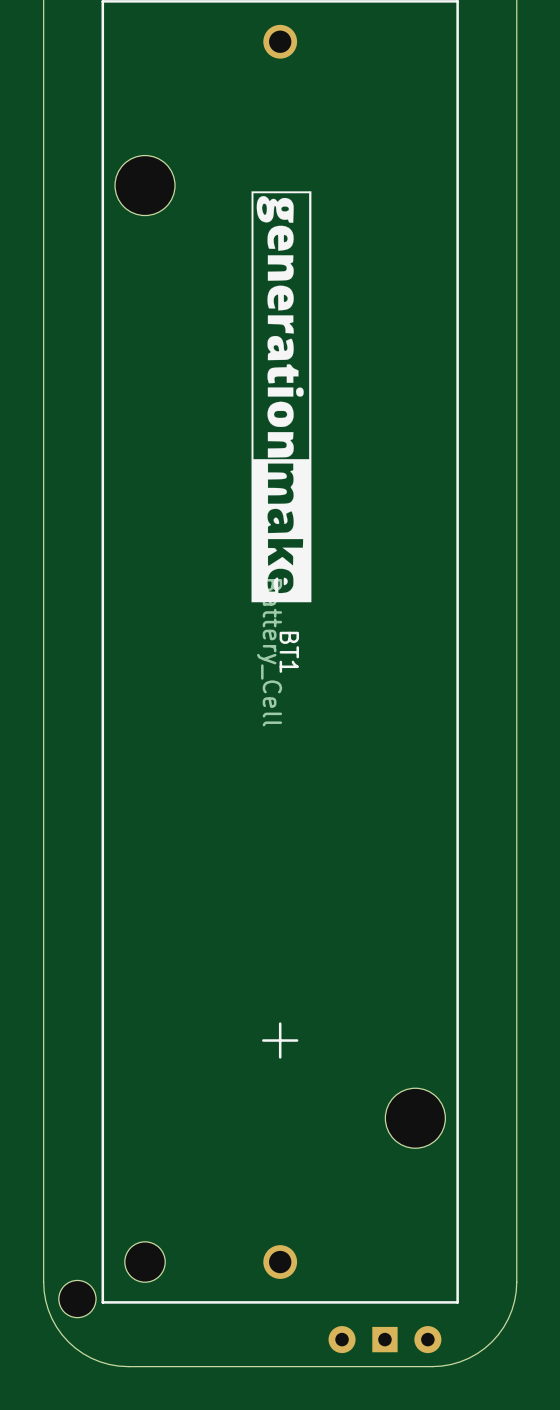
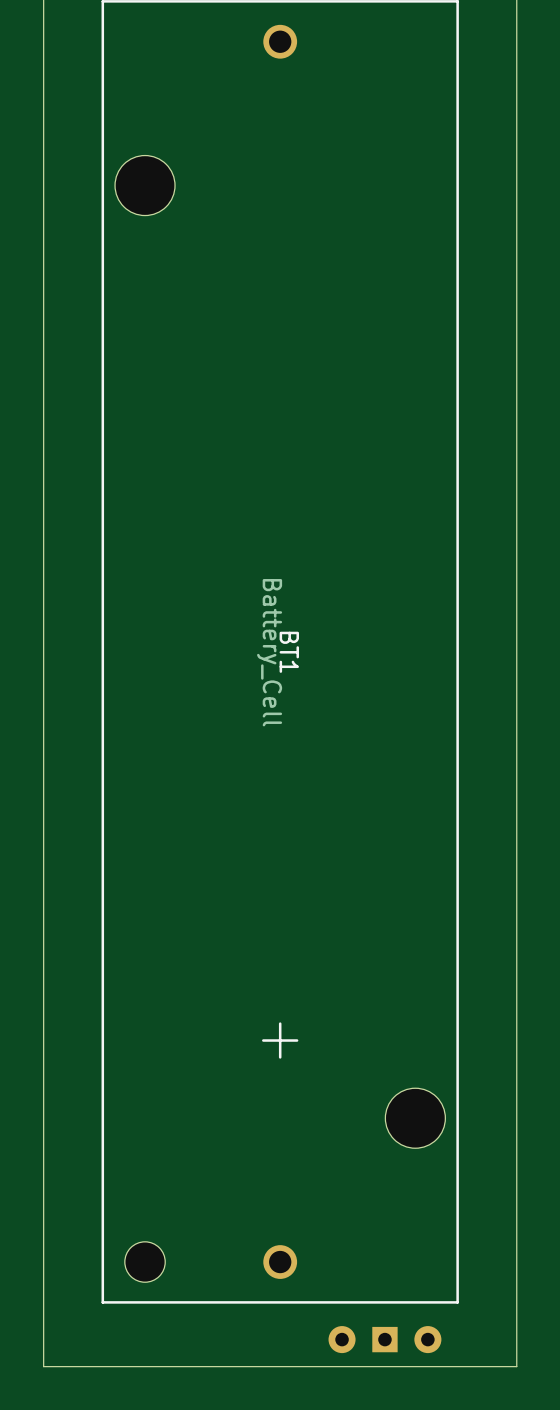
drawing: [251, 191, 312, 603] -> none
board edge: (43, 1282) (48, 1310) (56, 1327) (68, 1341) (91, 1358) (109, 1364) (128, 1366) -> (43, 1282) (43, 1366) (128, 1366)
board edge: (516, 1282) (512, 1310) (503, 1327) (492, 1341) (477, 1353) (460, 1361) (432, 1366) -> (516, 1282) (516, 1366) (432, 1366)
part: (77, 1299) -> none

